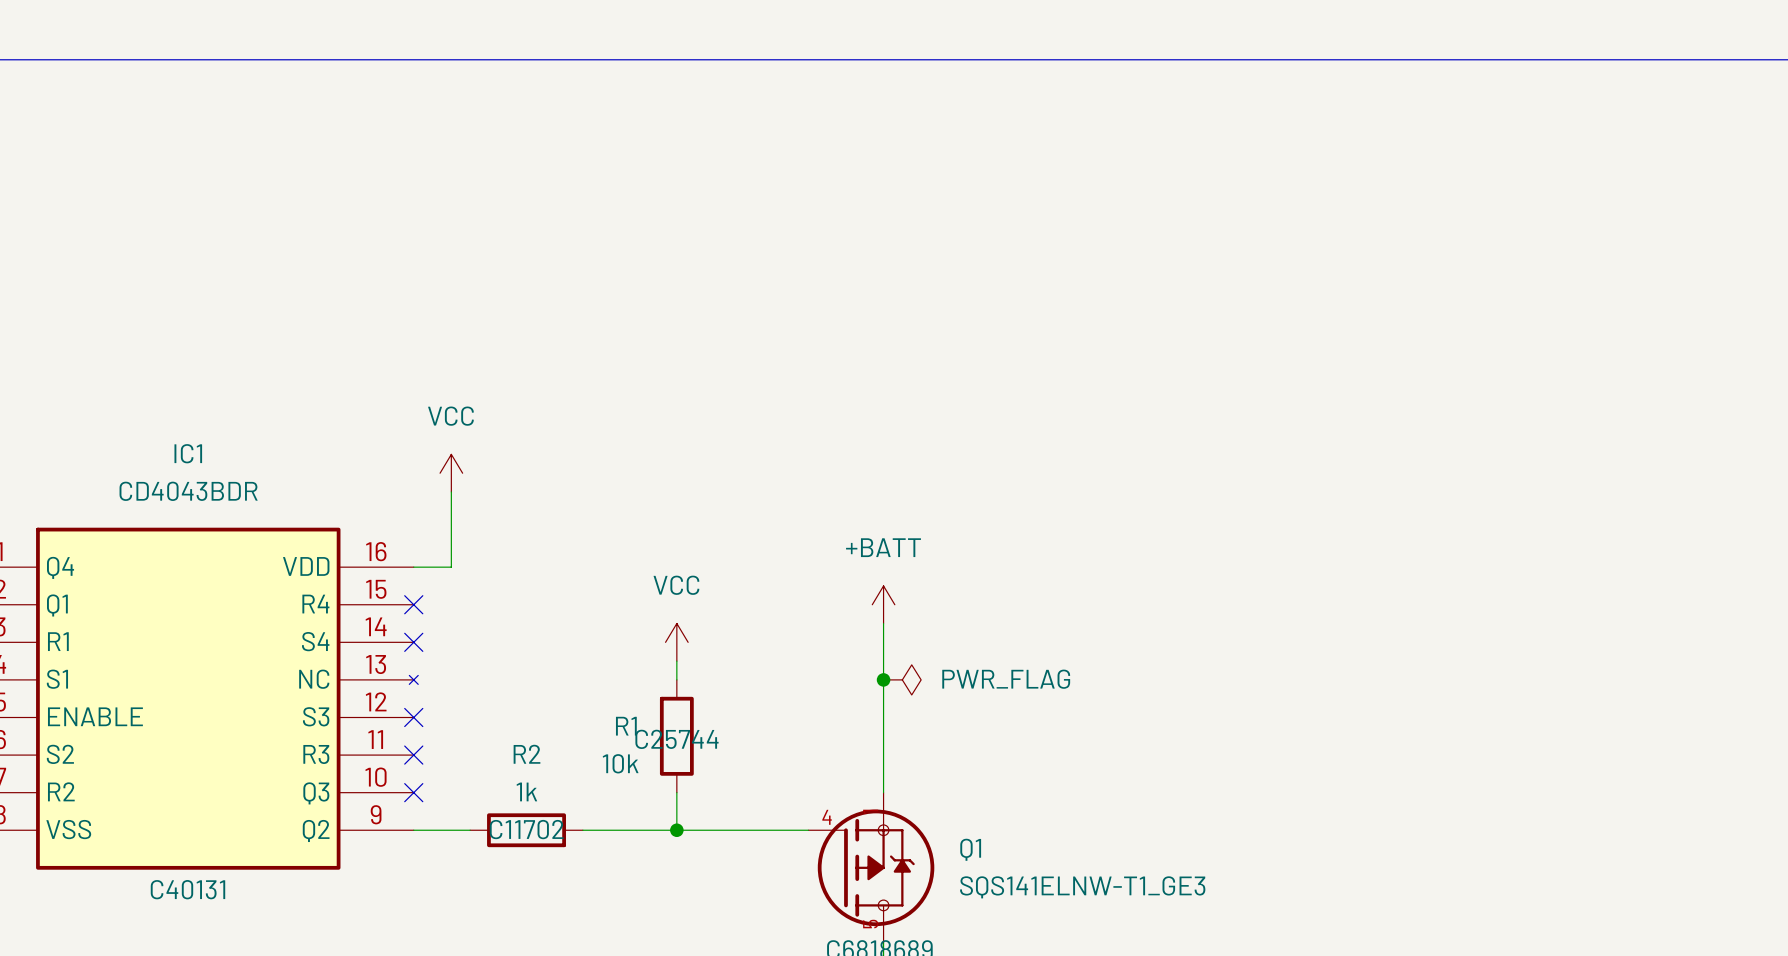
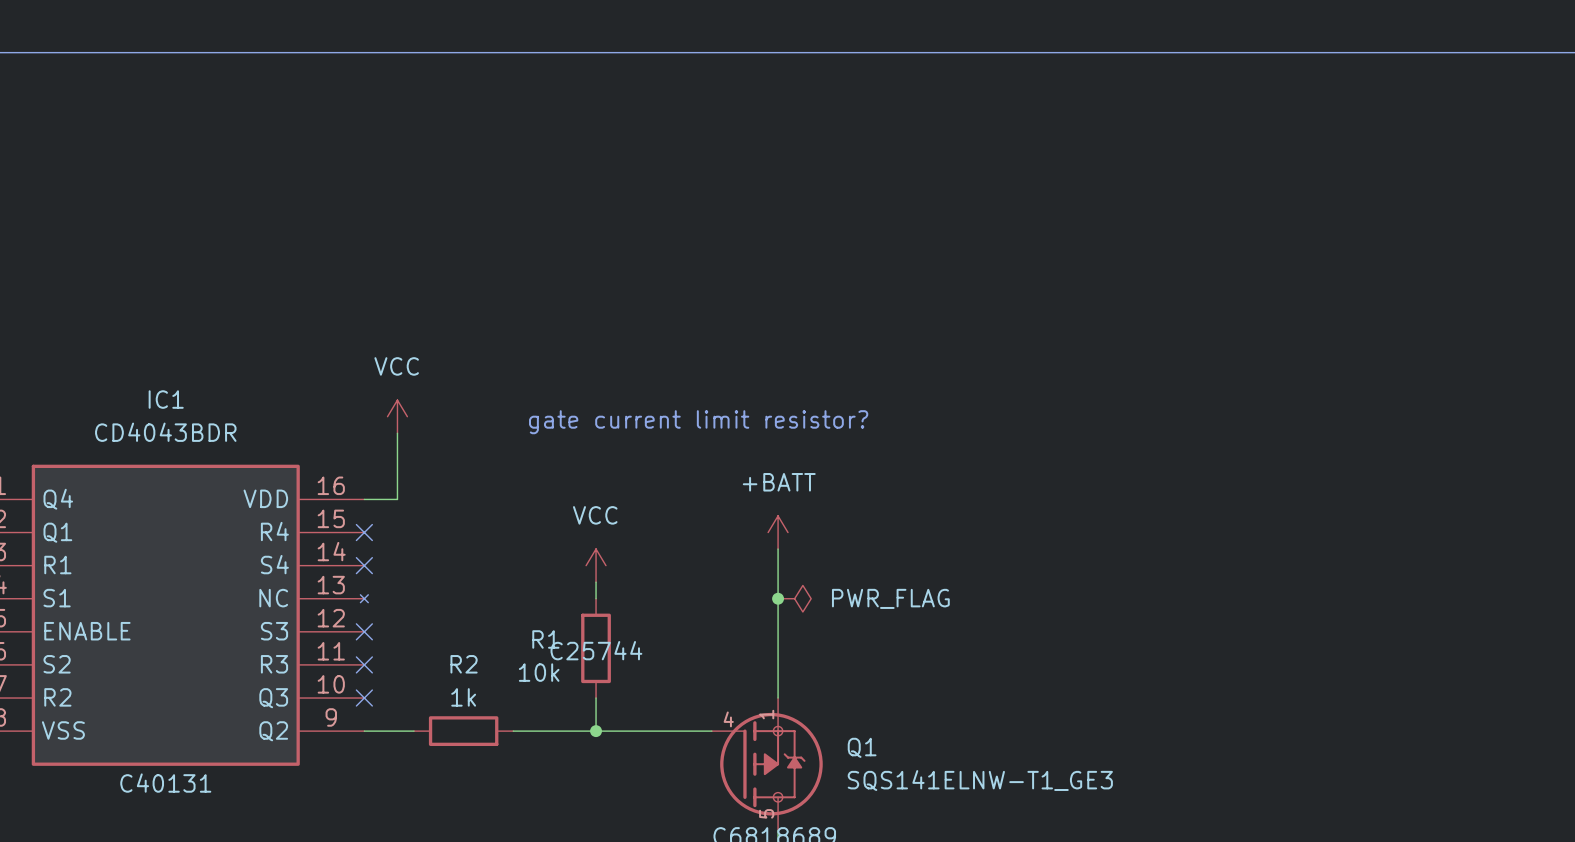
text: none -> gate current limit resistor? (698, 422)
R2 text: C11702 (526, 829) -> none

